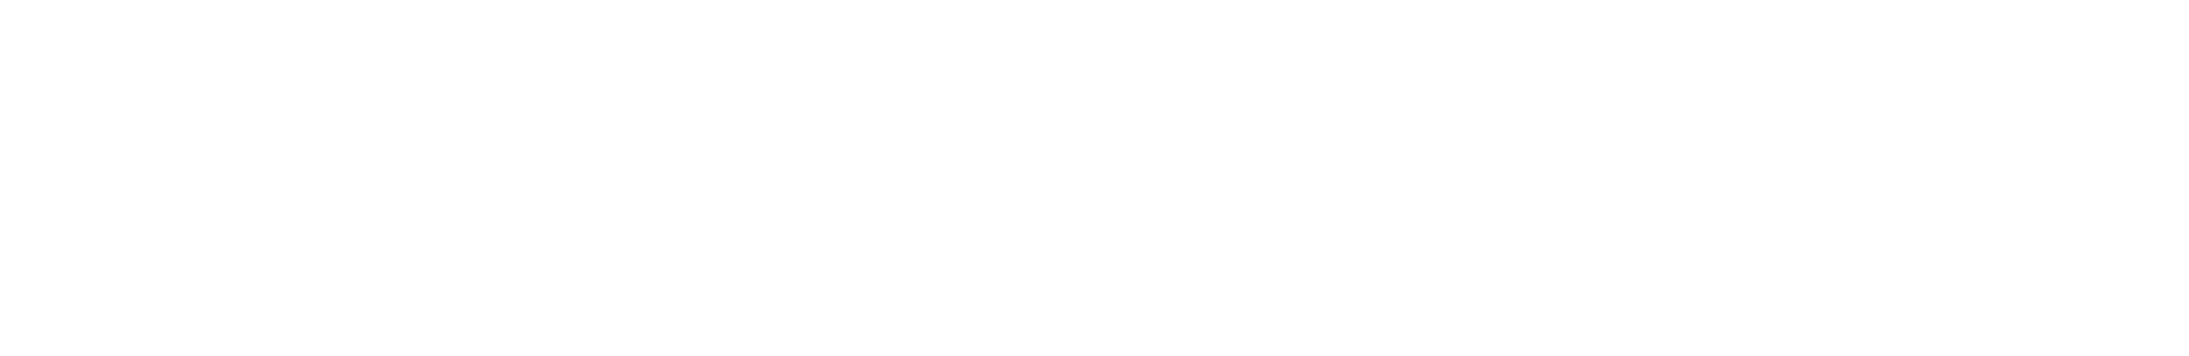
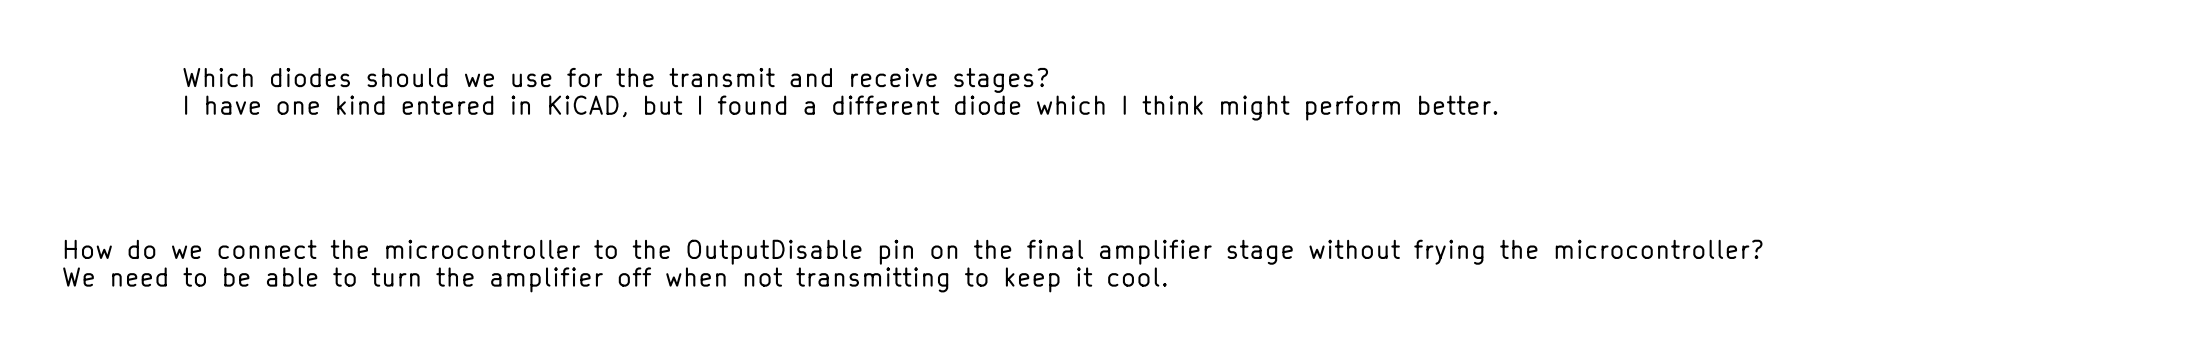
text: none -> Which diodes should we use for the transmit and receive stages? (615, 80)
text: none -> I have one kind entered in KiCAD, but I found a different diode which I think might perform better. (841, 108)
text: none -> How do we connect the microcontroller to the OutputDisable pin on the final amplifier stage without frying the microcontroller? (913, 252)
text: none -> We need to be able to turn the amplifier off when not transmitting to keep it cool. (614, 279)

